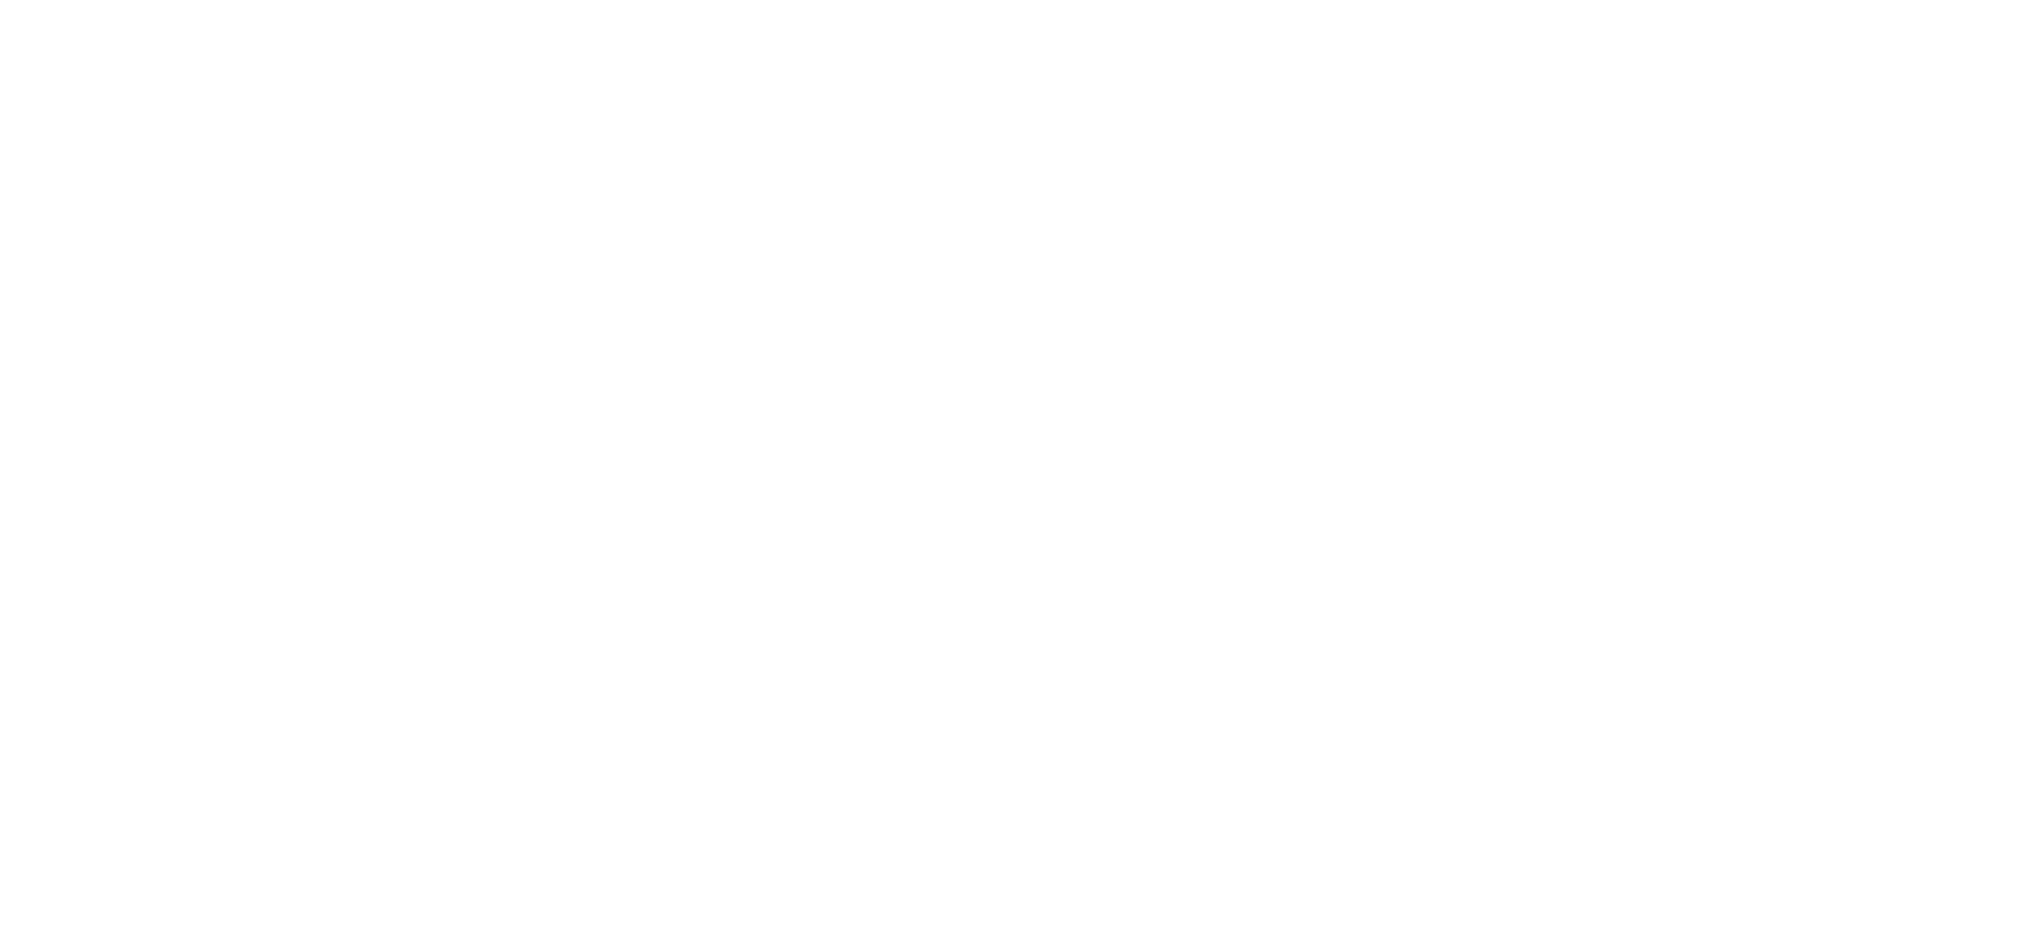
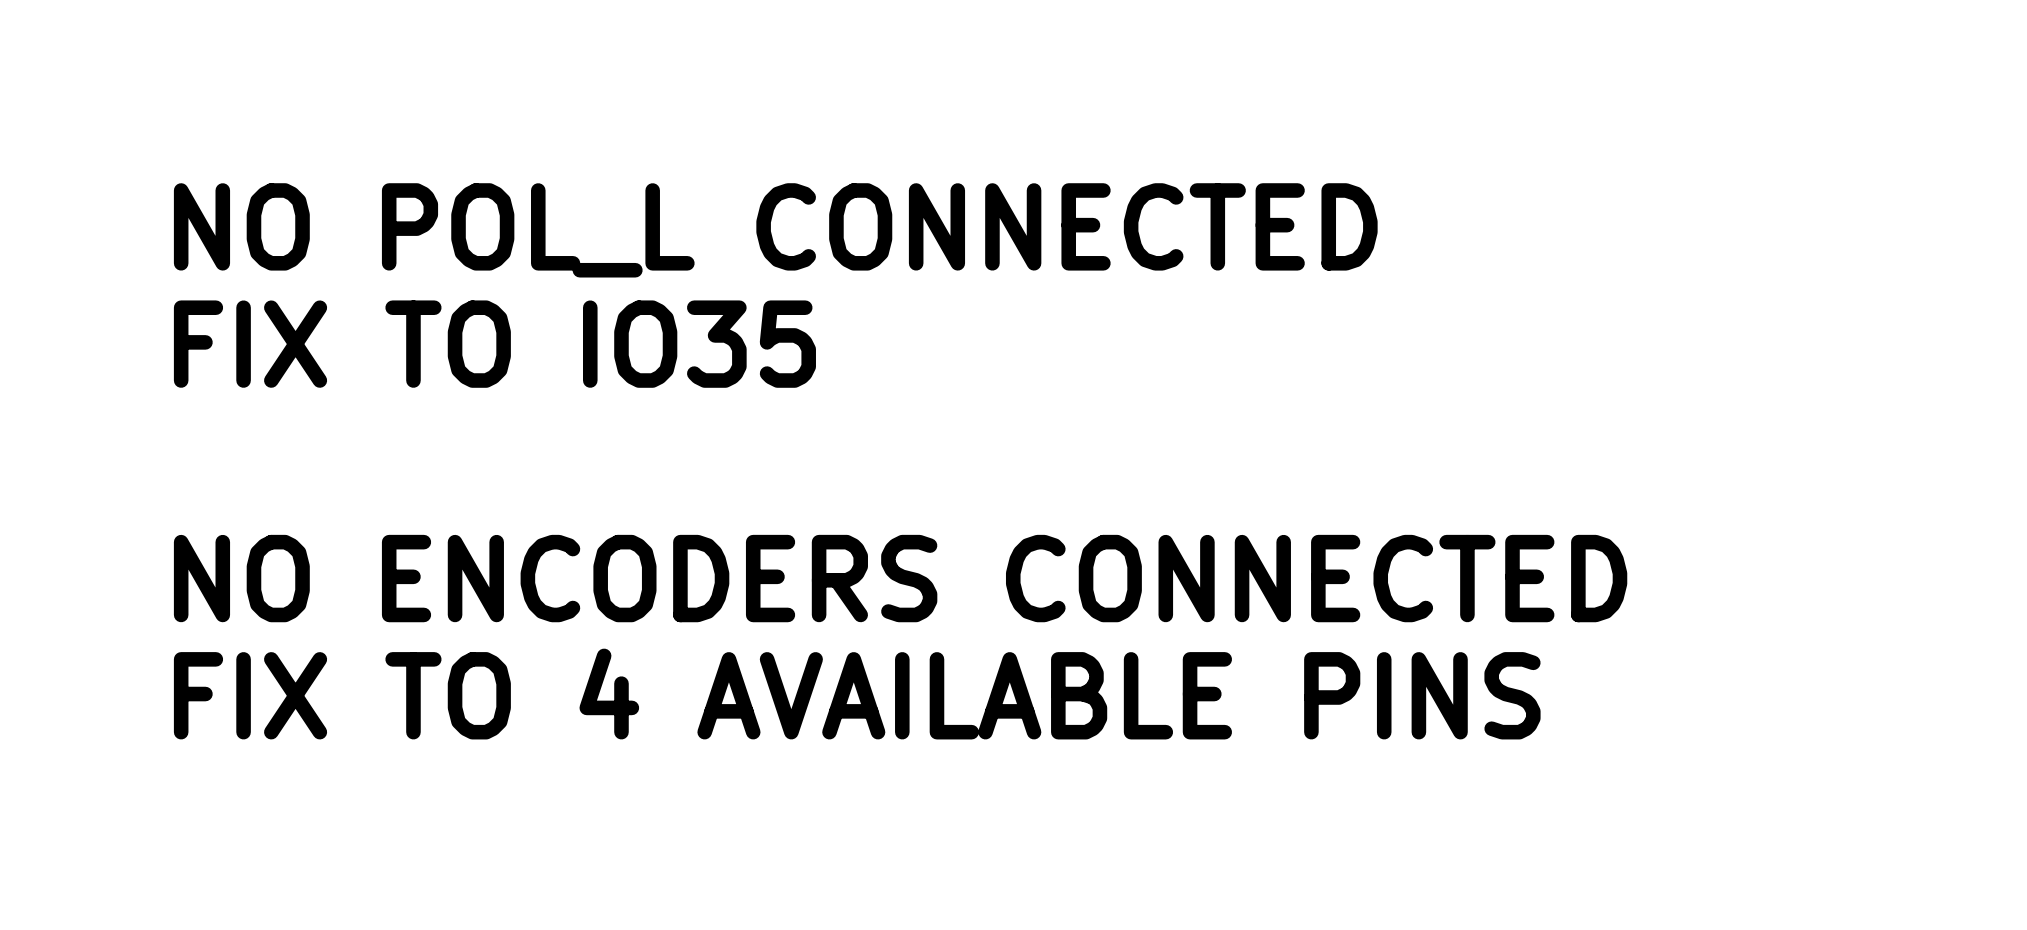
text: none -> NO POL_L CONNECTED (775, 230)
text: none -> FIX TO IO35 (494, 344)
text: none -> NO ENCODERS CONNECTED (900, 578)
text: none -> FIX TO 4 AVAILABLE PINS (857, 694)

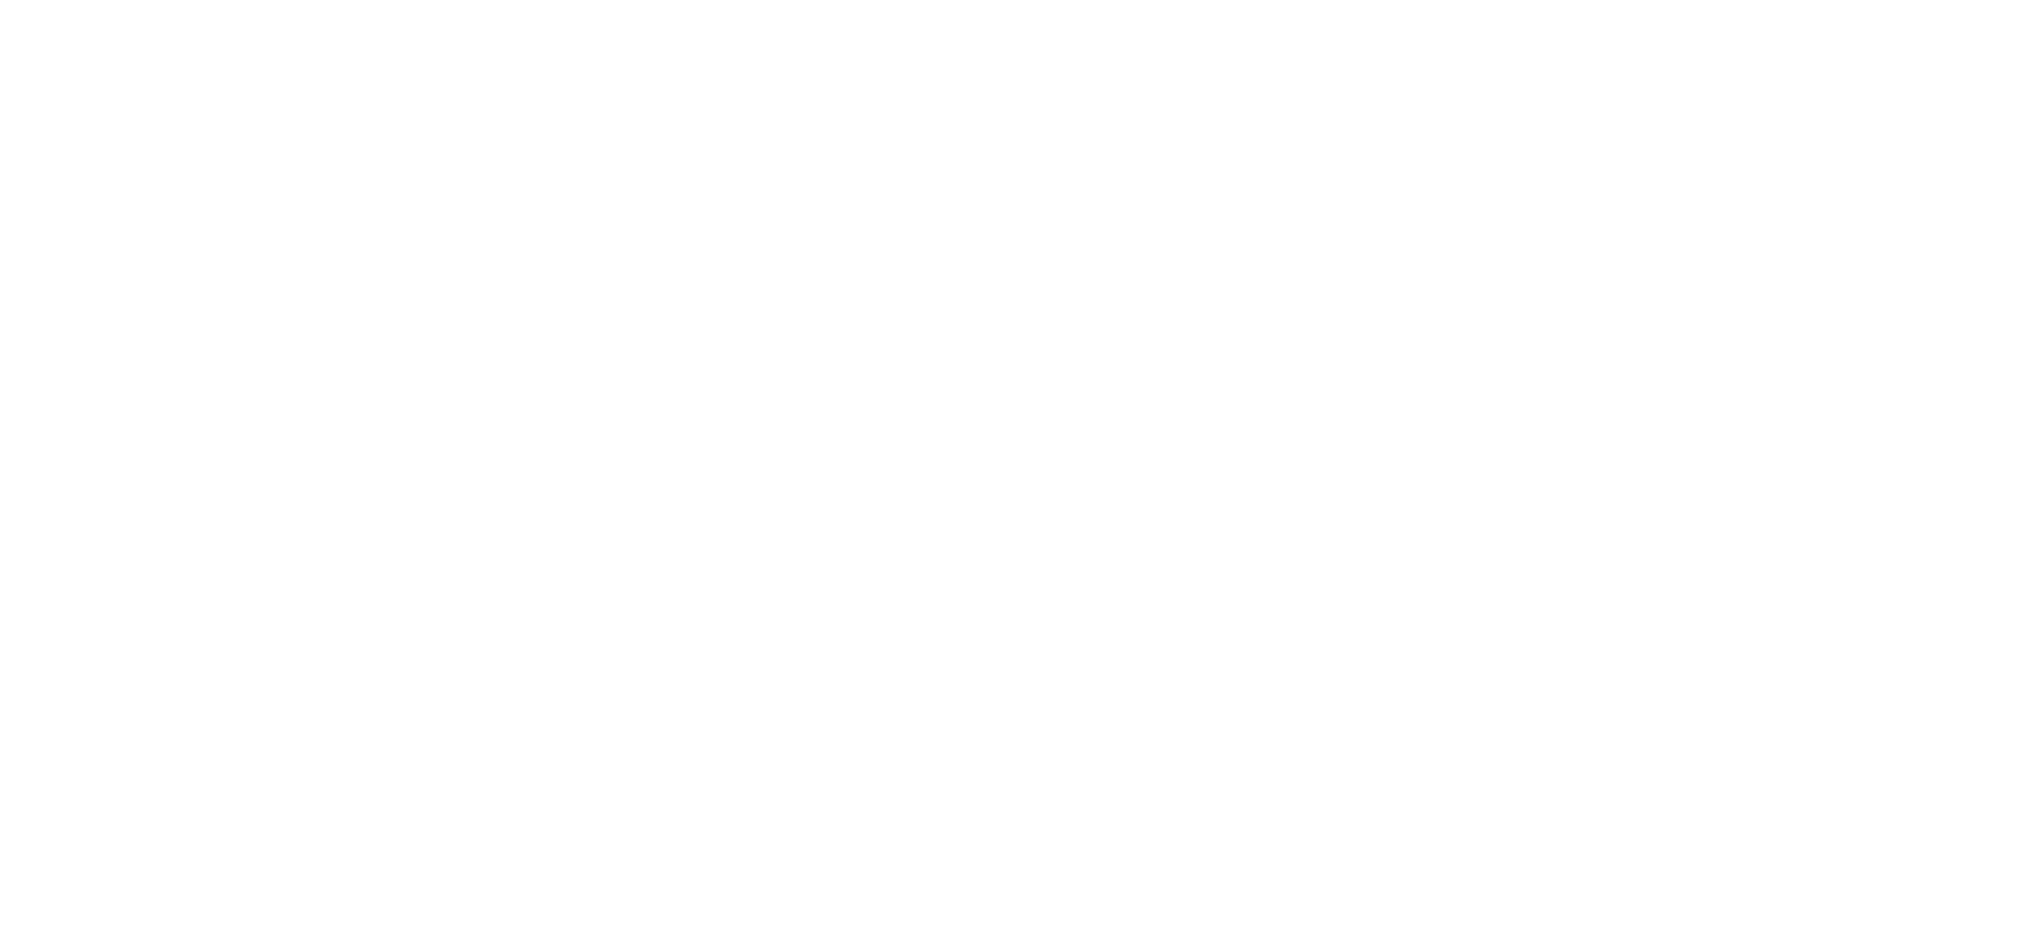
text: NO POL_L CONNECTED (775, 230) -> none
text: FIX TO IO35 (494, 344) -> none
text: NO ENCODERS CONNECTED (900, 578) -> none
text: FIX TO 4 AVAILABLE PINS (857, 694) -> none

